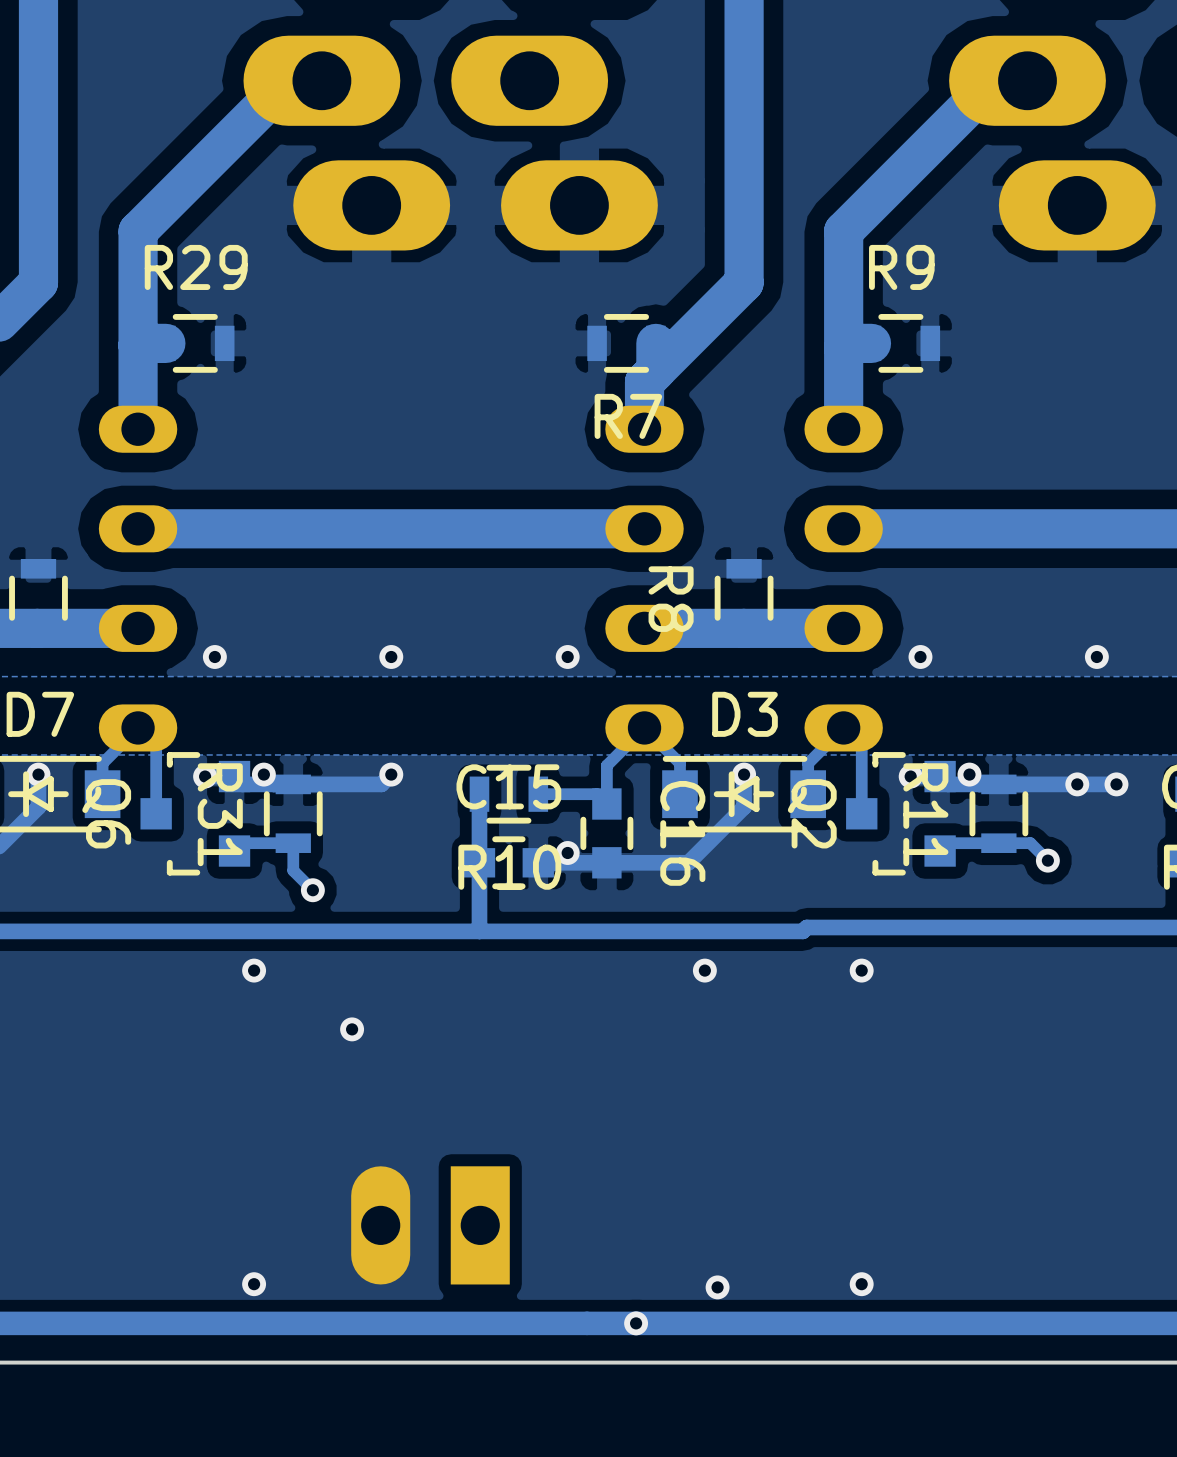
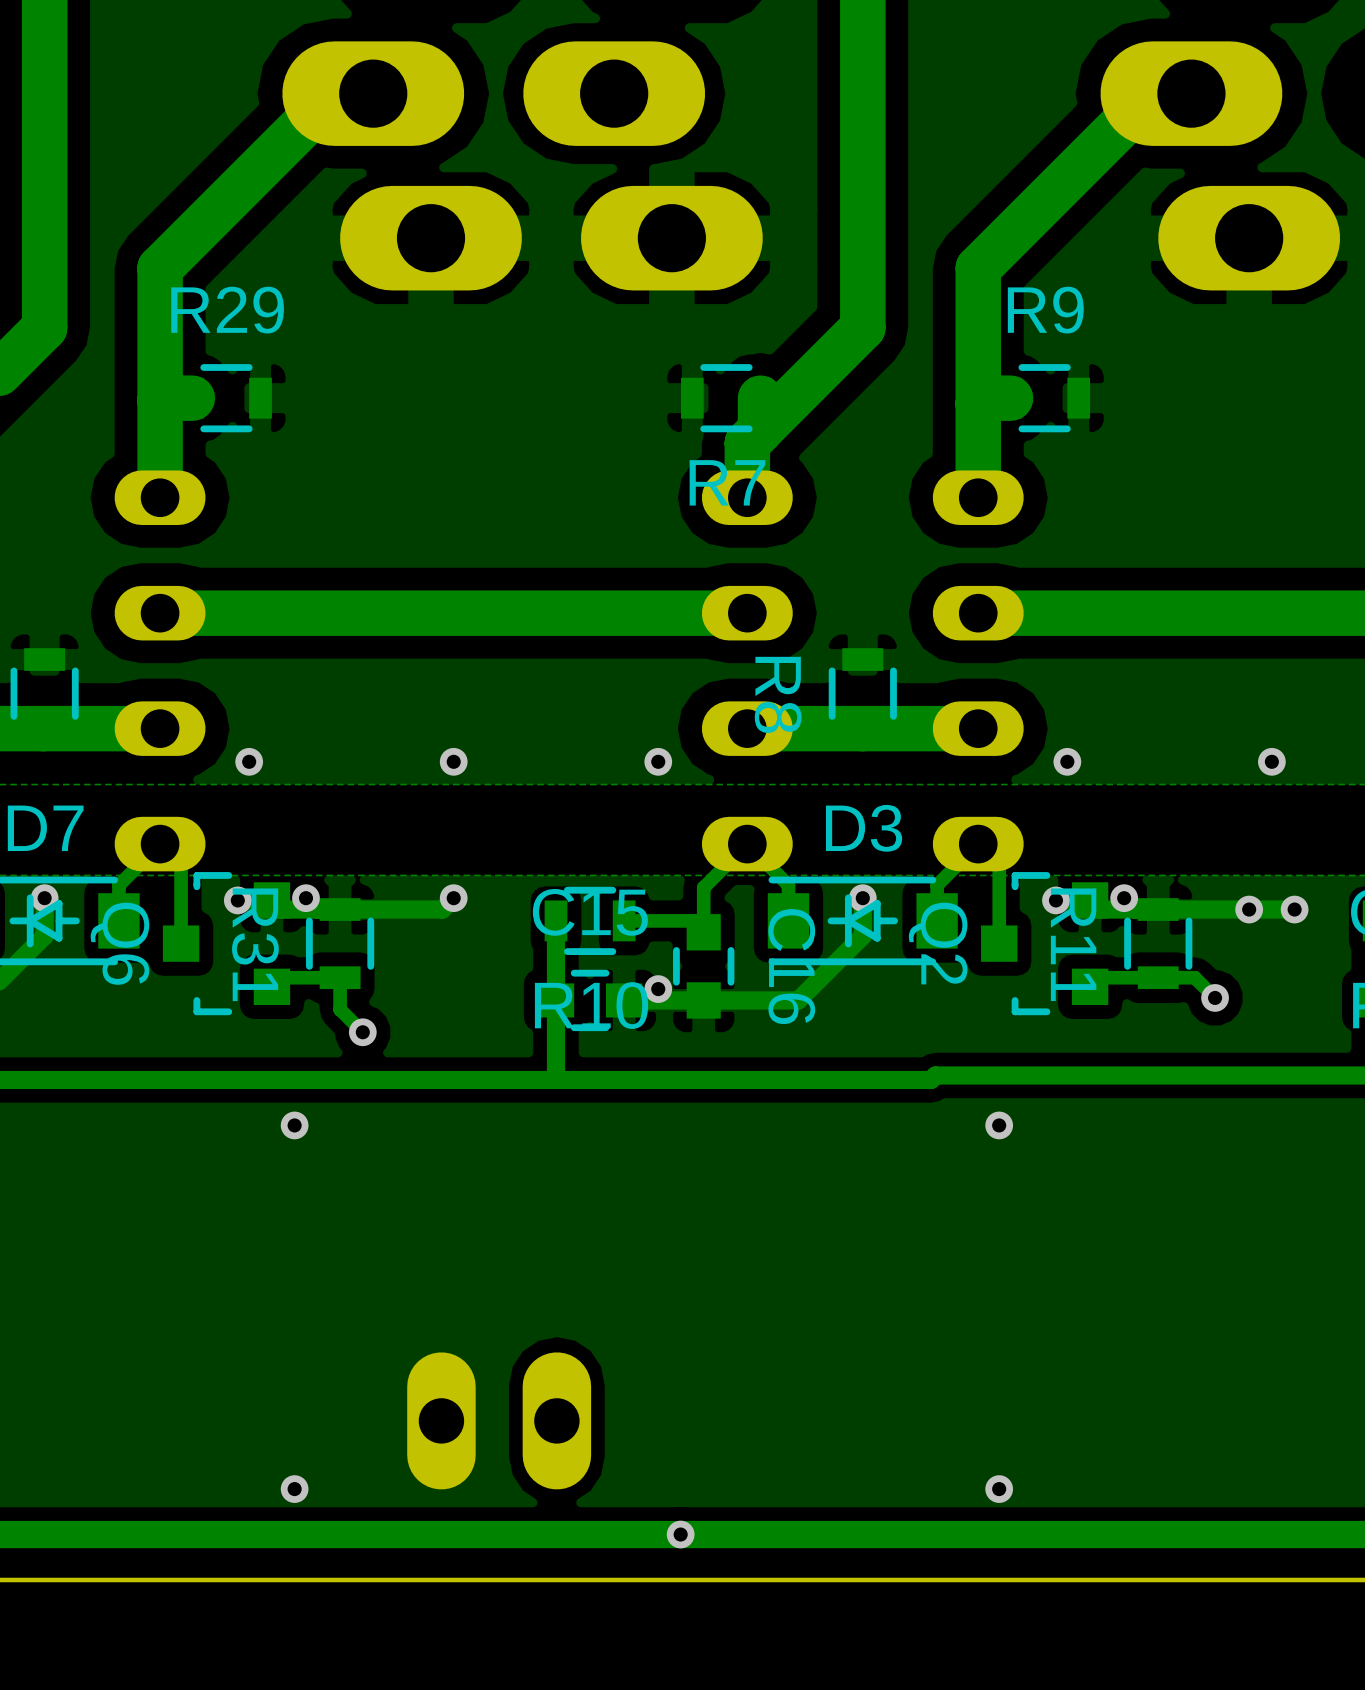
via: (704, 970) -> none
via: (352, 1029) -> none
part footprint: [351, 1166, 510, 1285] -> [407, 1352, 592, 1490]
via: (717, 1287) -> none
via position: (636, 1323) -> (680, 1534)

